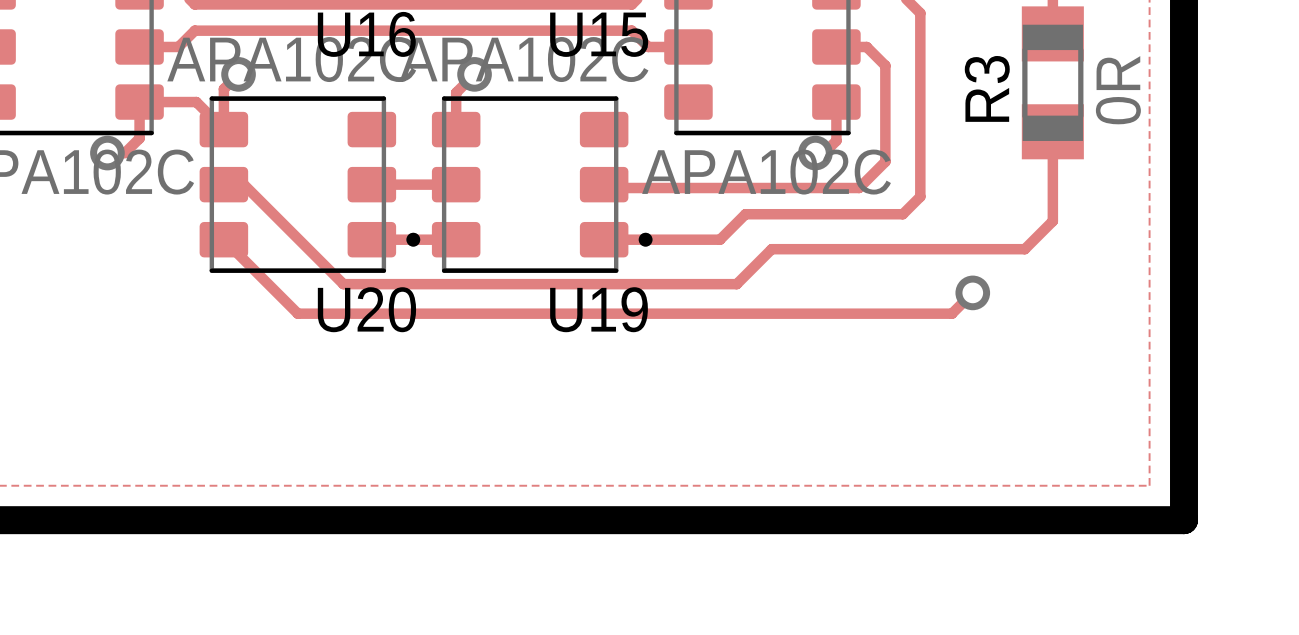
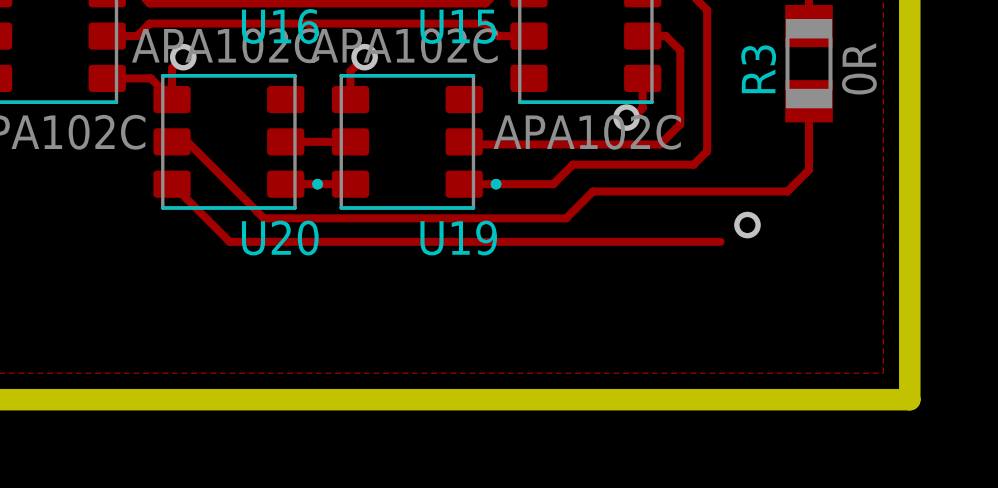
track: (139, 102) (139, 138) (124, 153) (107, 153) -> none
via: (107, 153) -> none
track: (972, 292) (951, 313) (297, 313) -> (720, 241) (228, 241)

